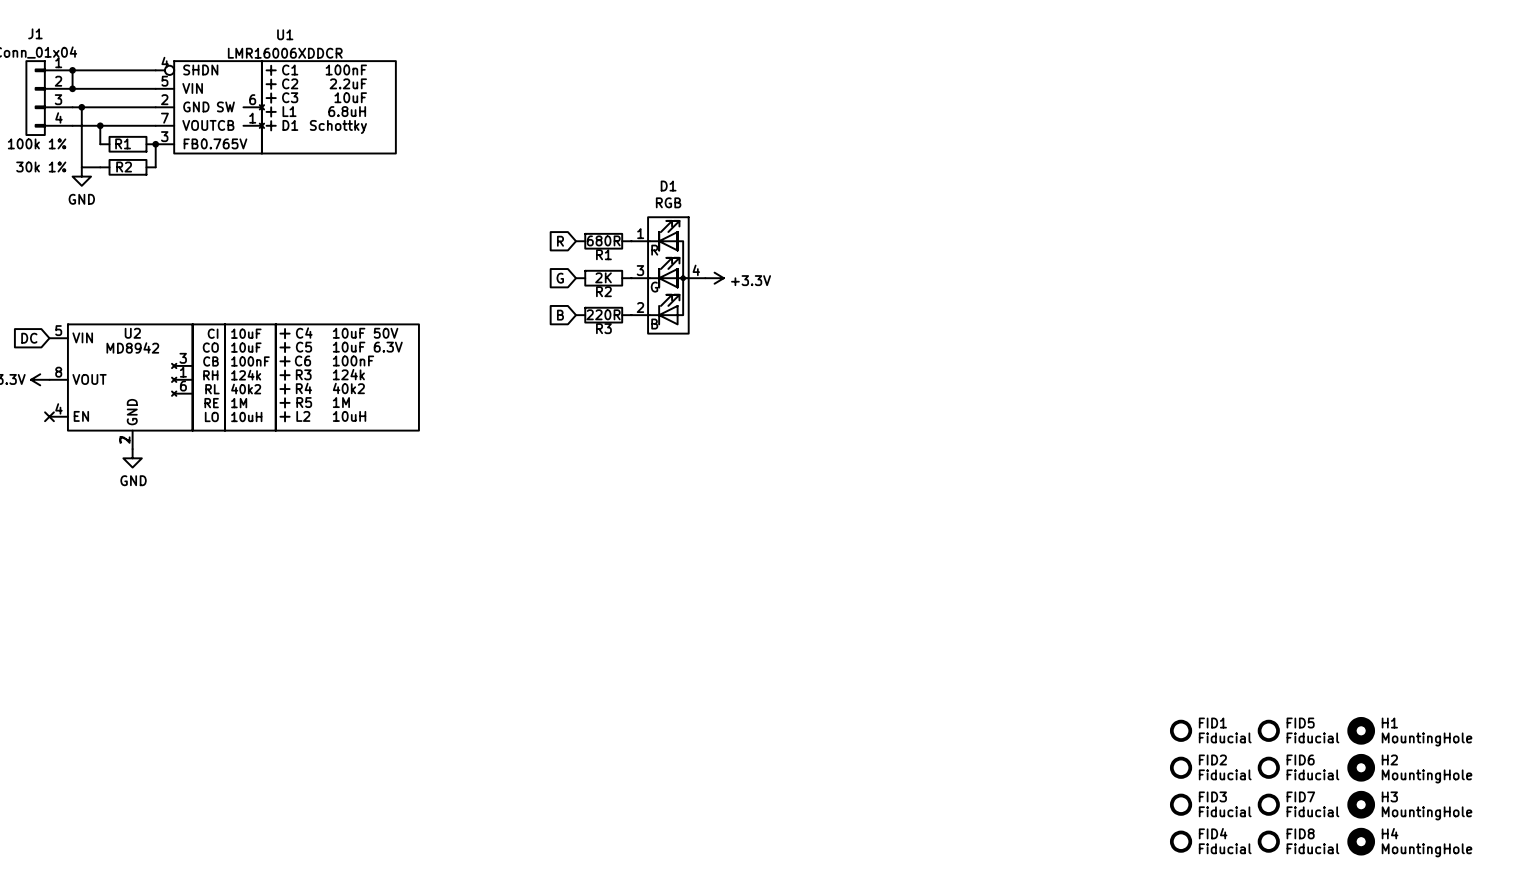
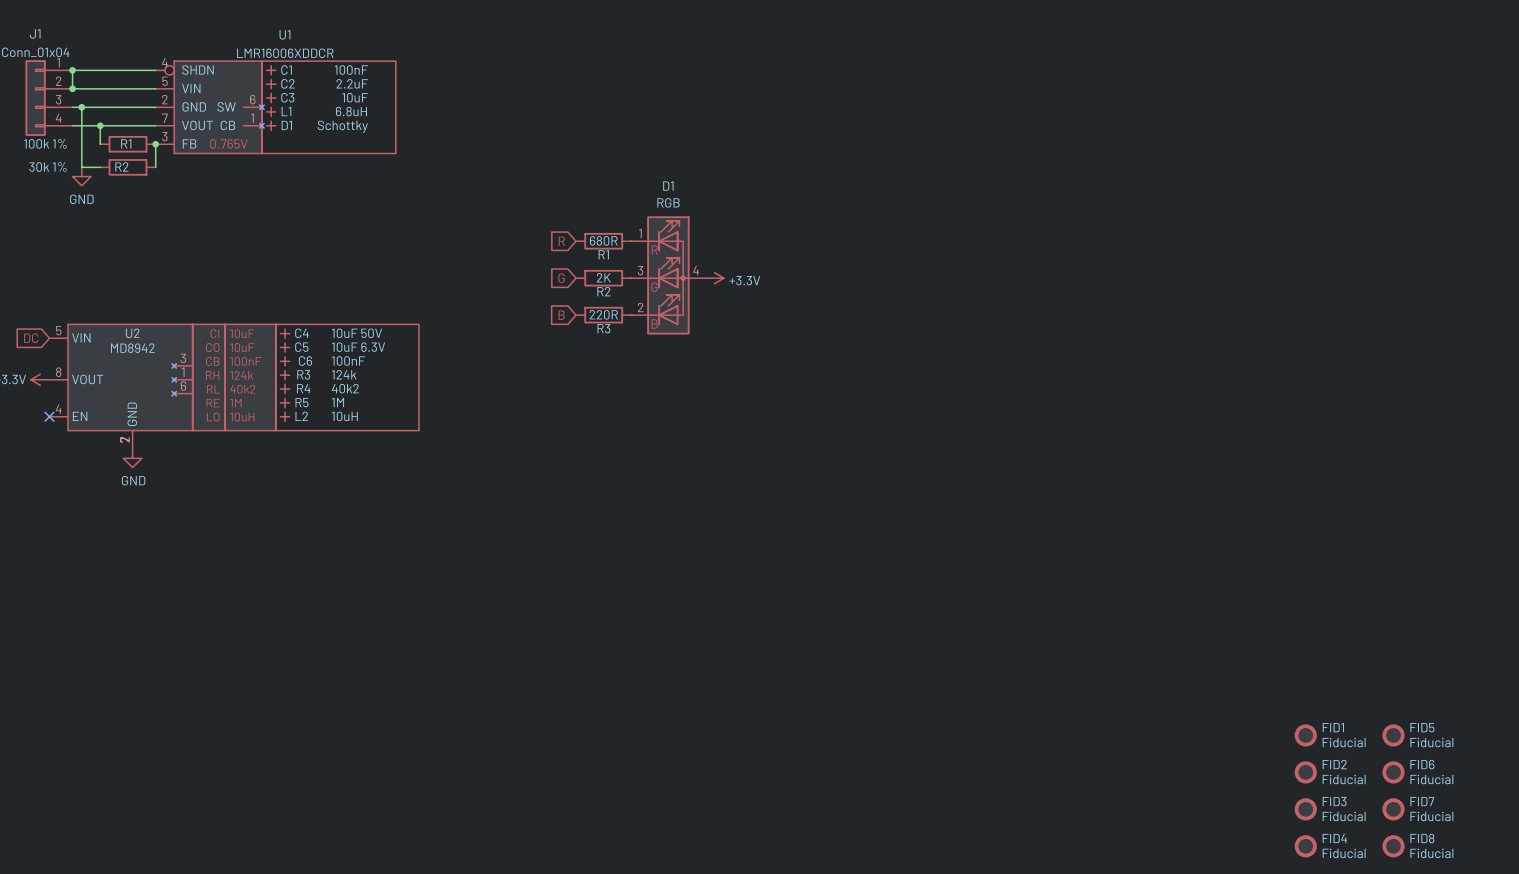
FID1 position: (1181, 730) -> (1305, 735)
FID5 position: (1268, 730) -> (1393, 735)
H1: MountingHole (1361, 730) -> none
FID2 position: (1181, 767) -> (1305, 772)
FID6 position: (1268, 767) -> (1393, 772)
H2: MountingHole (1361, 767) -> none
FID3 position: (1181, 804) -> (1305, 809)
FID7 position: (1268, 804) -> (1393, 809)
H3: MountingHole (1361, 804) -> none
FID4 position: (1181, 841) -> (1305, 846)
FID8 position: (1268, 841) -> (1393, 846)
H4: MountingHole (1361, 841) -> none

